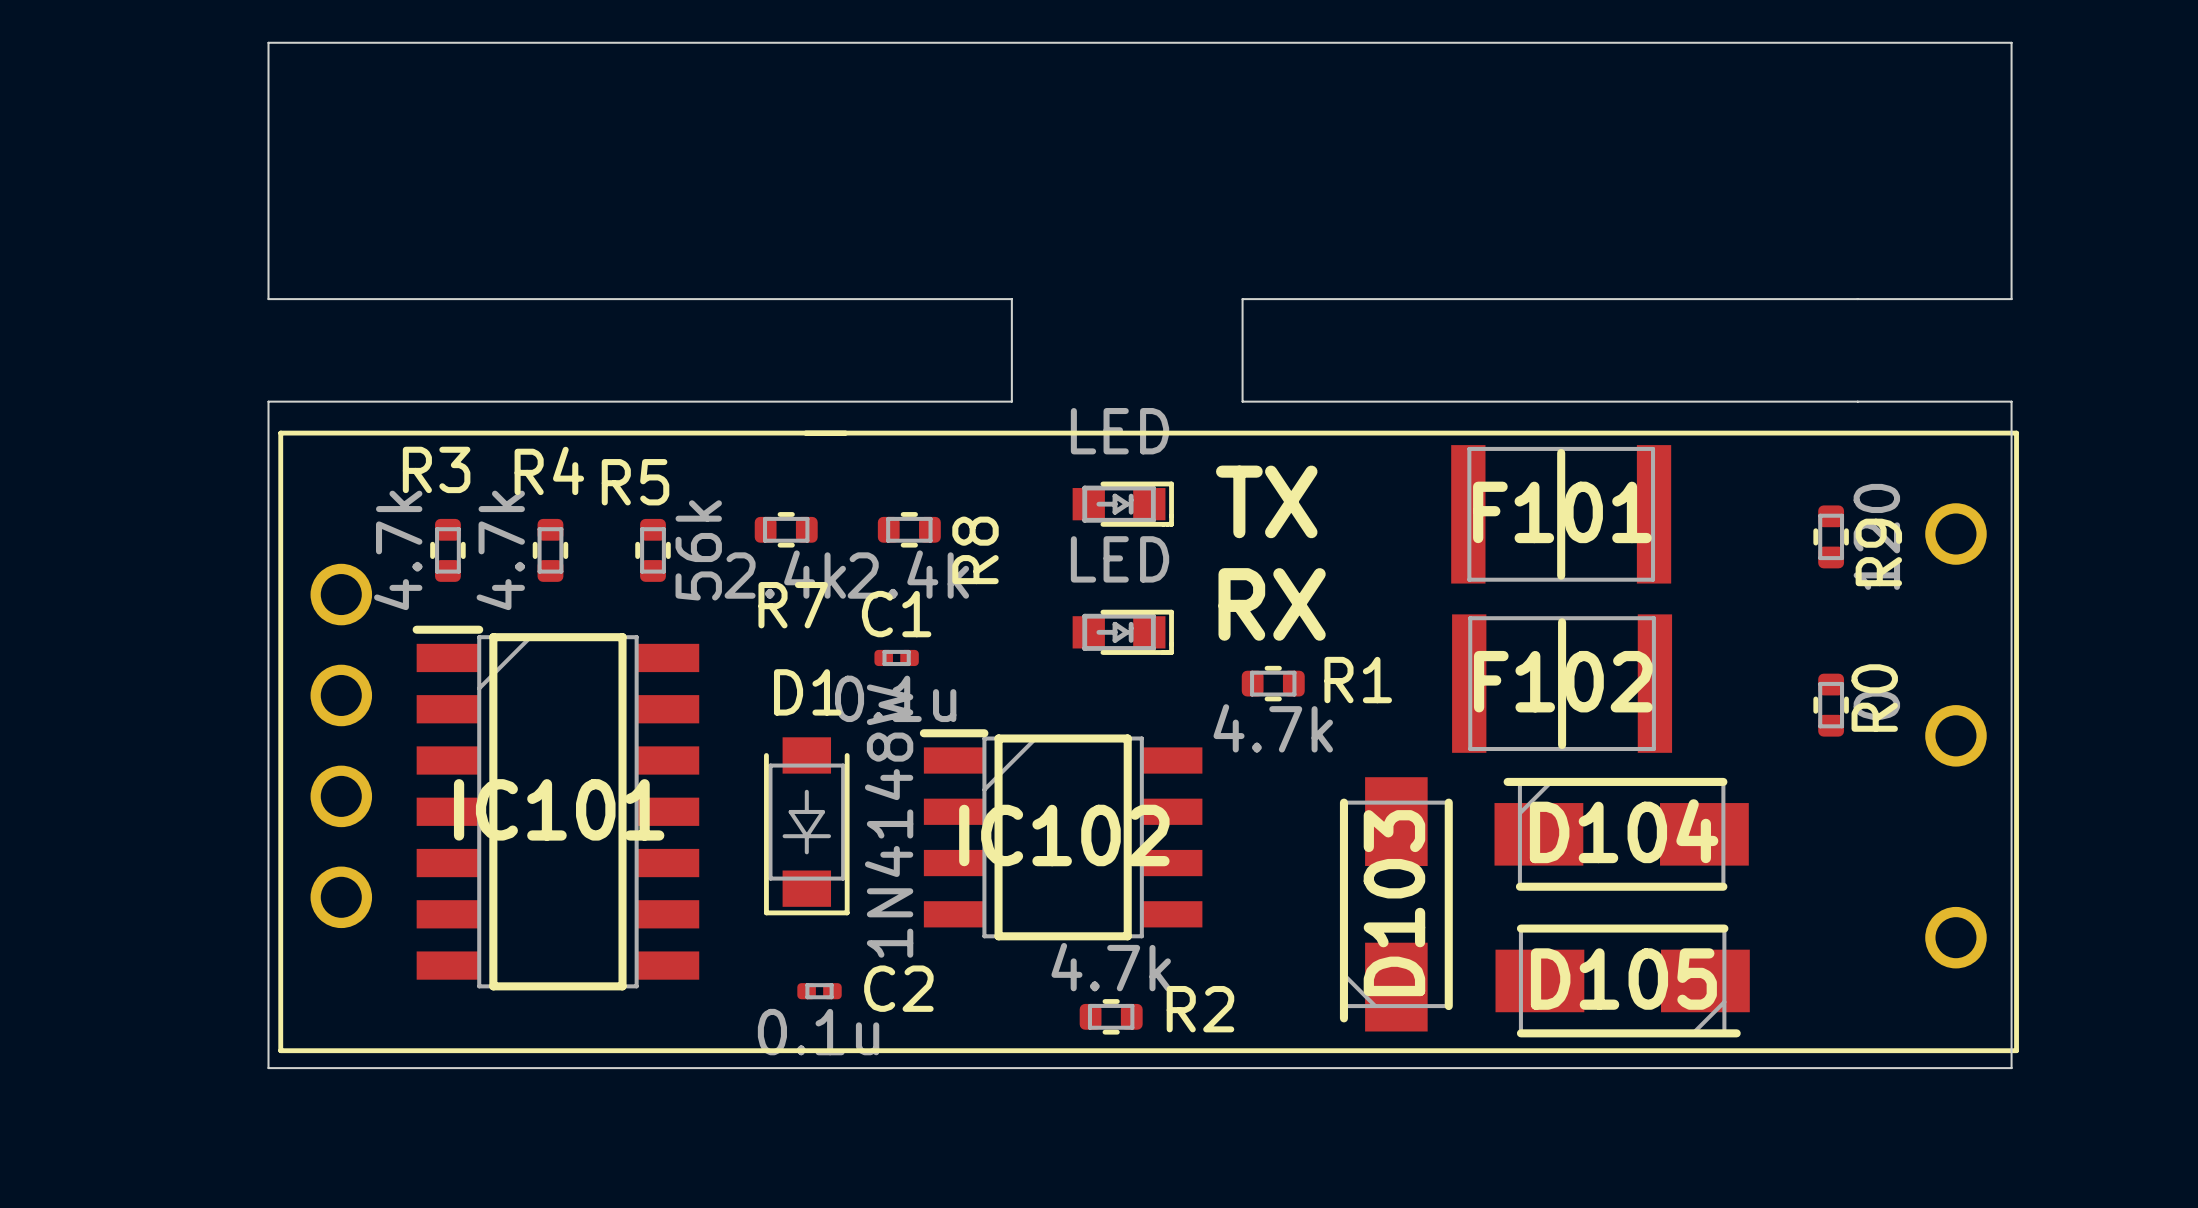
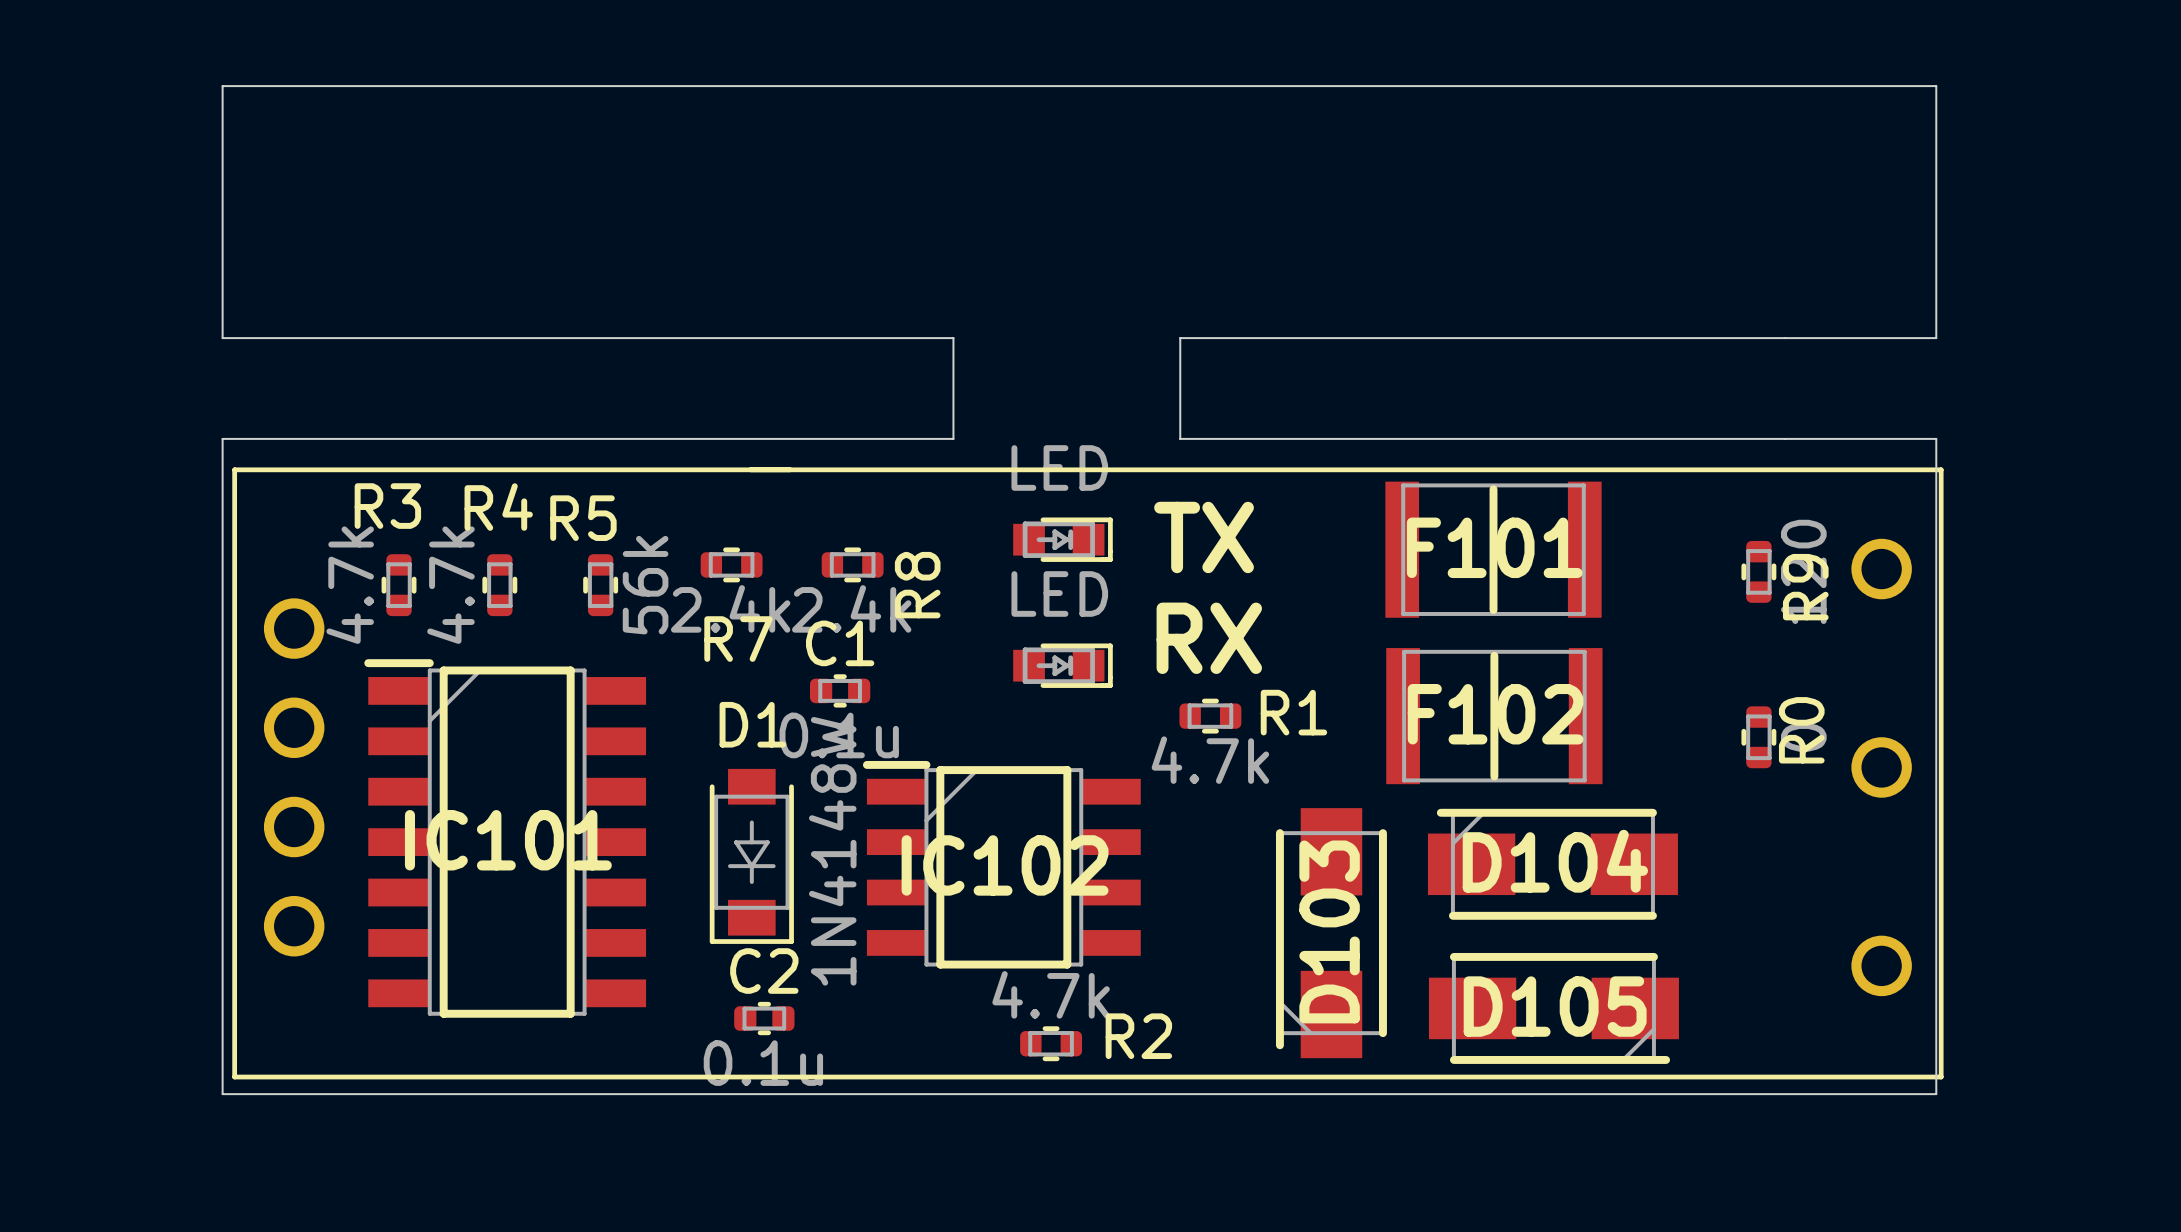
C1 footprint: [874, 649, 919, 667] -> [809, 674, 871, 708]
C2 footprint: [797, 983, 842, 1000] -> [734, 1001, 795, 1036]
C2 name position: C2 (898, 988) -> C2 (764, 971)

